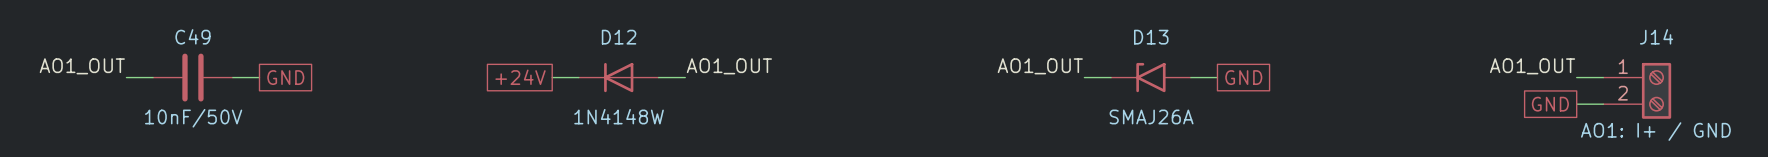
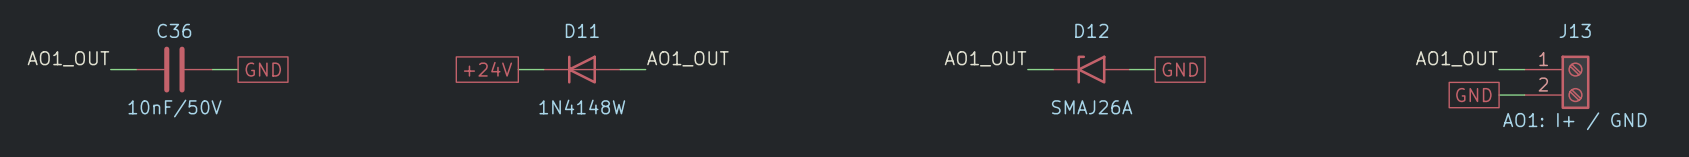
C49 name: C49 (192, 36) -> C36 (174, 30)
J14 name: J14 (1656, 36) -> J13 (1575, 30)
D12 name: D12 (619, 37) -> D11 (582, 30)
D13 name: D13 (1151, 37) -> D12 (1091, 30)

